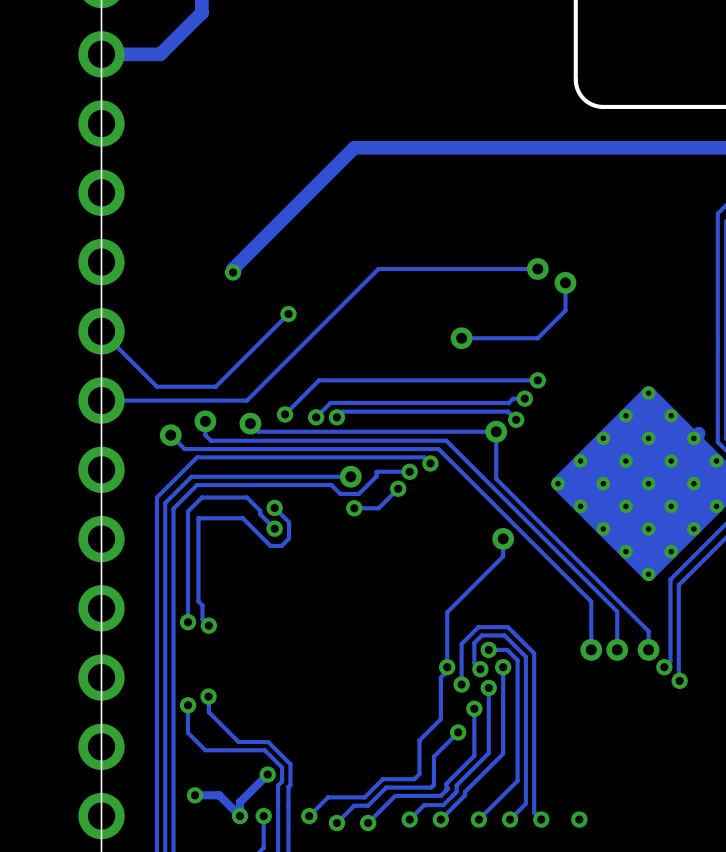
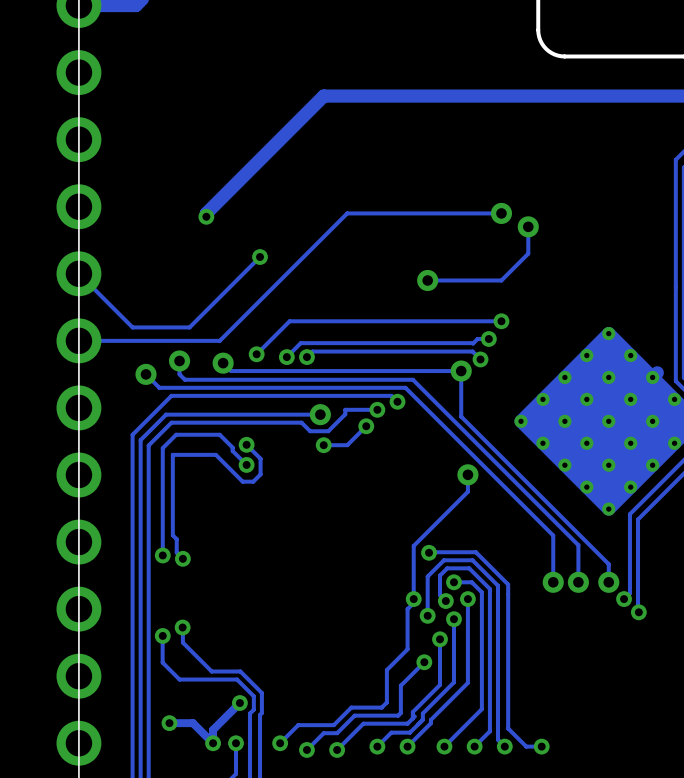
track: none -> (429, 552) (475, 552) (508, 584) (508, 728) (526, 746) (541, 746)
via: none -> (429, 552)

